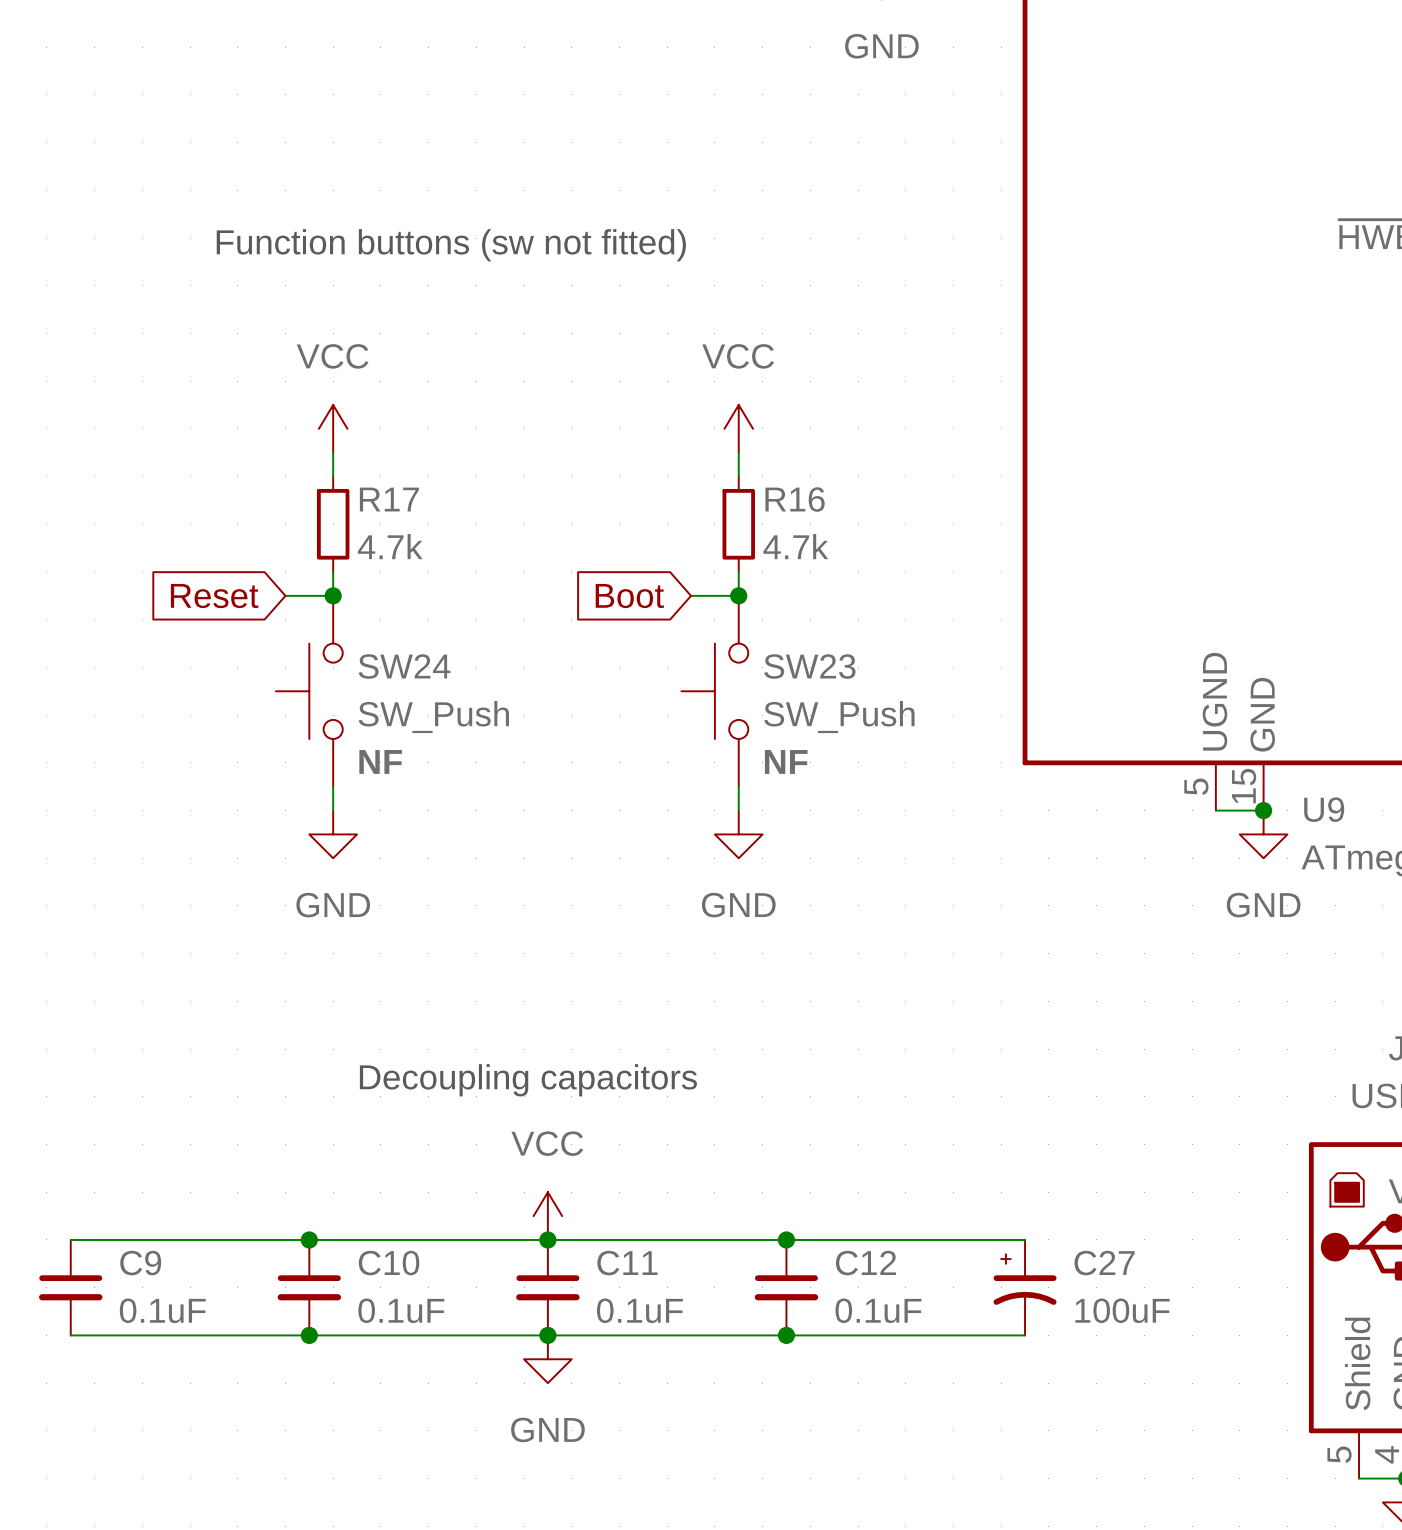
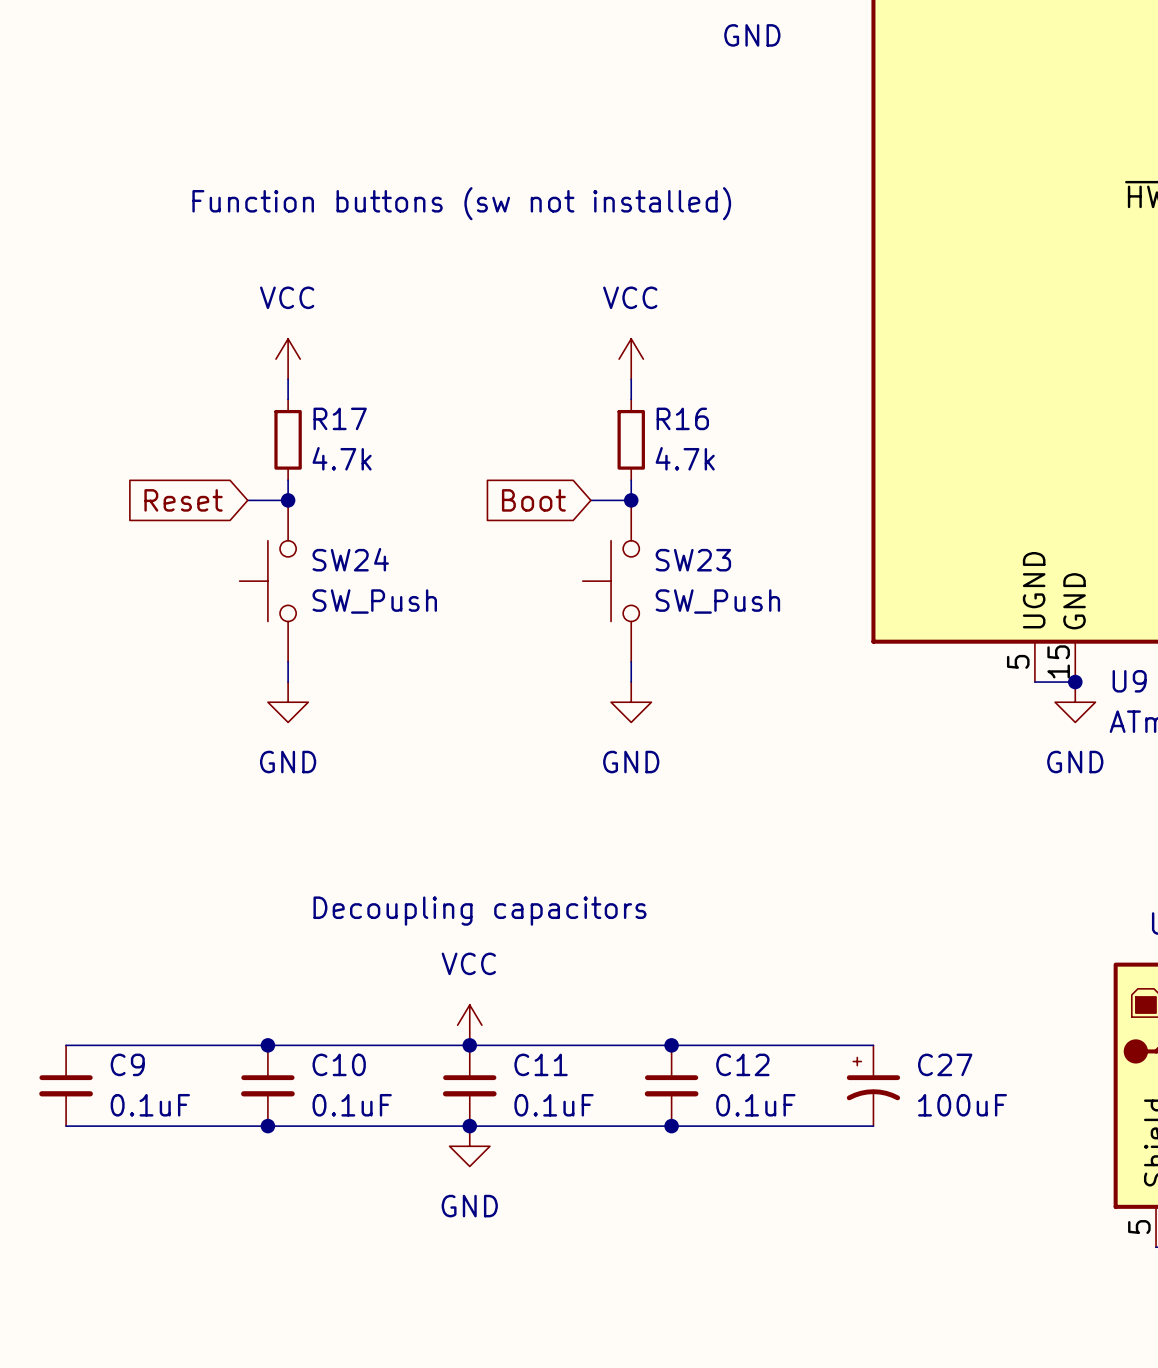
text: Function buttons (sw not fitted) (451, 245) -> Function buttons (sw not installed) (461, 203)
SW24 text: NF (380, 761) -> none
SW23 text: NF (786, 761) -> none

